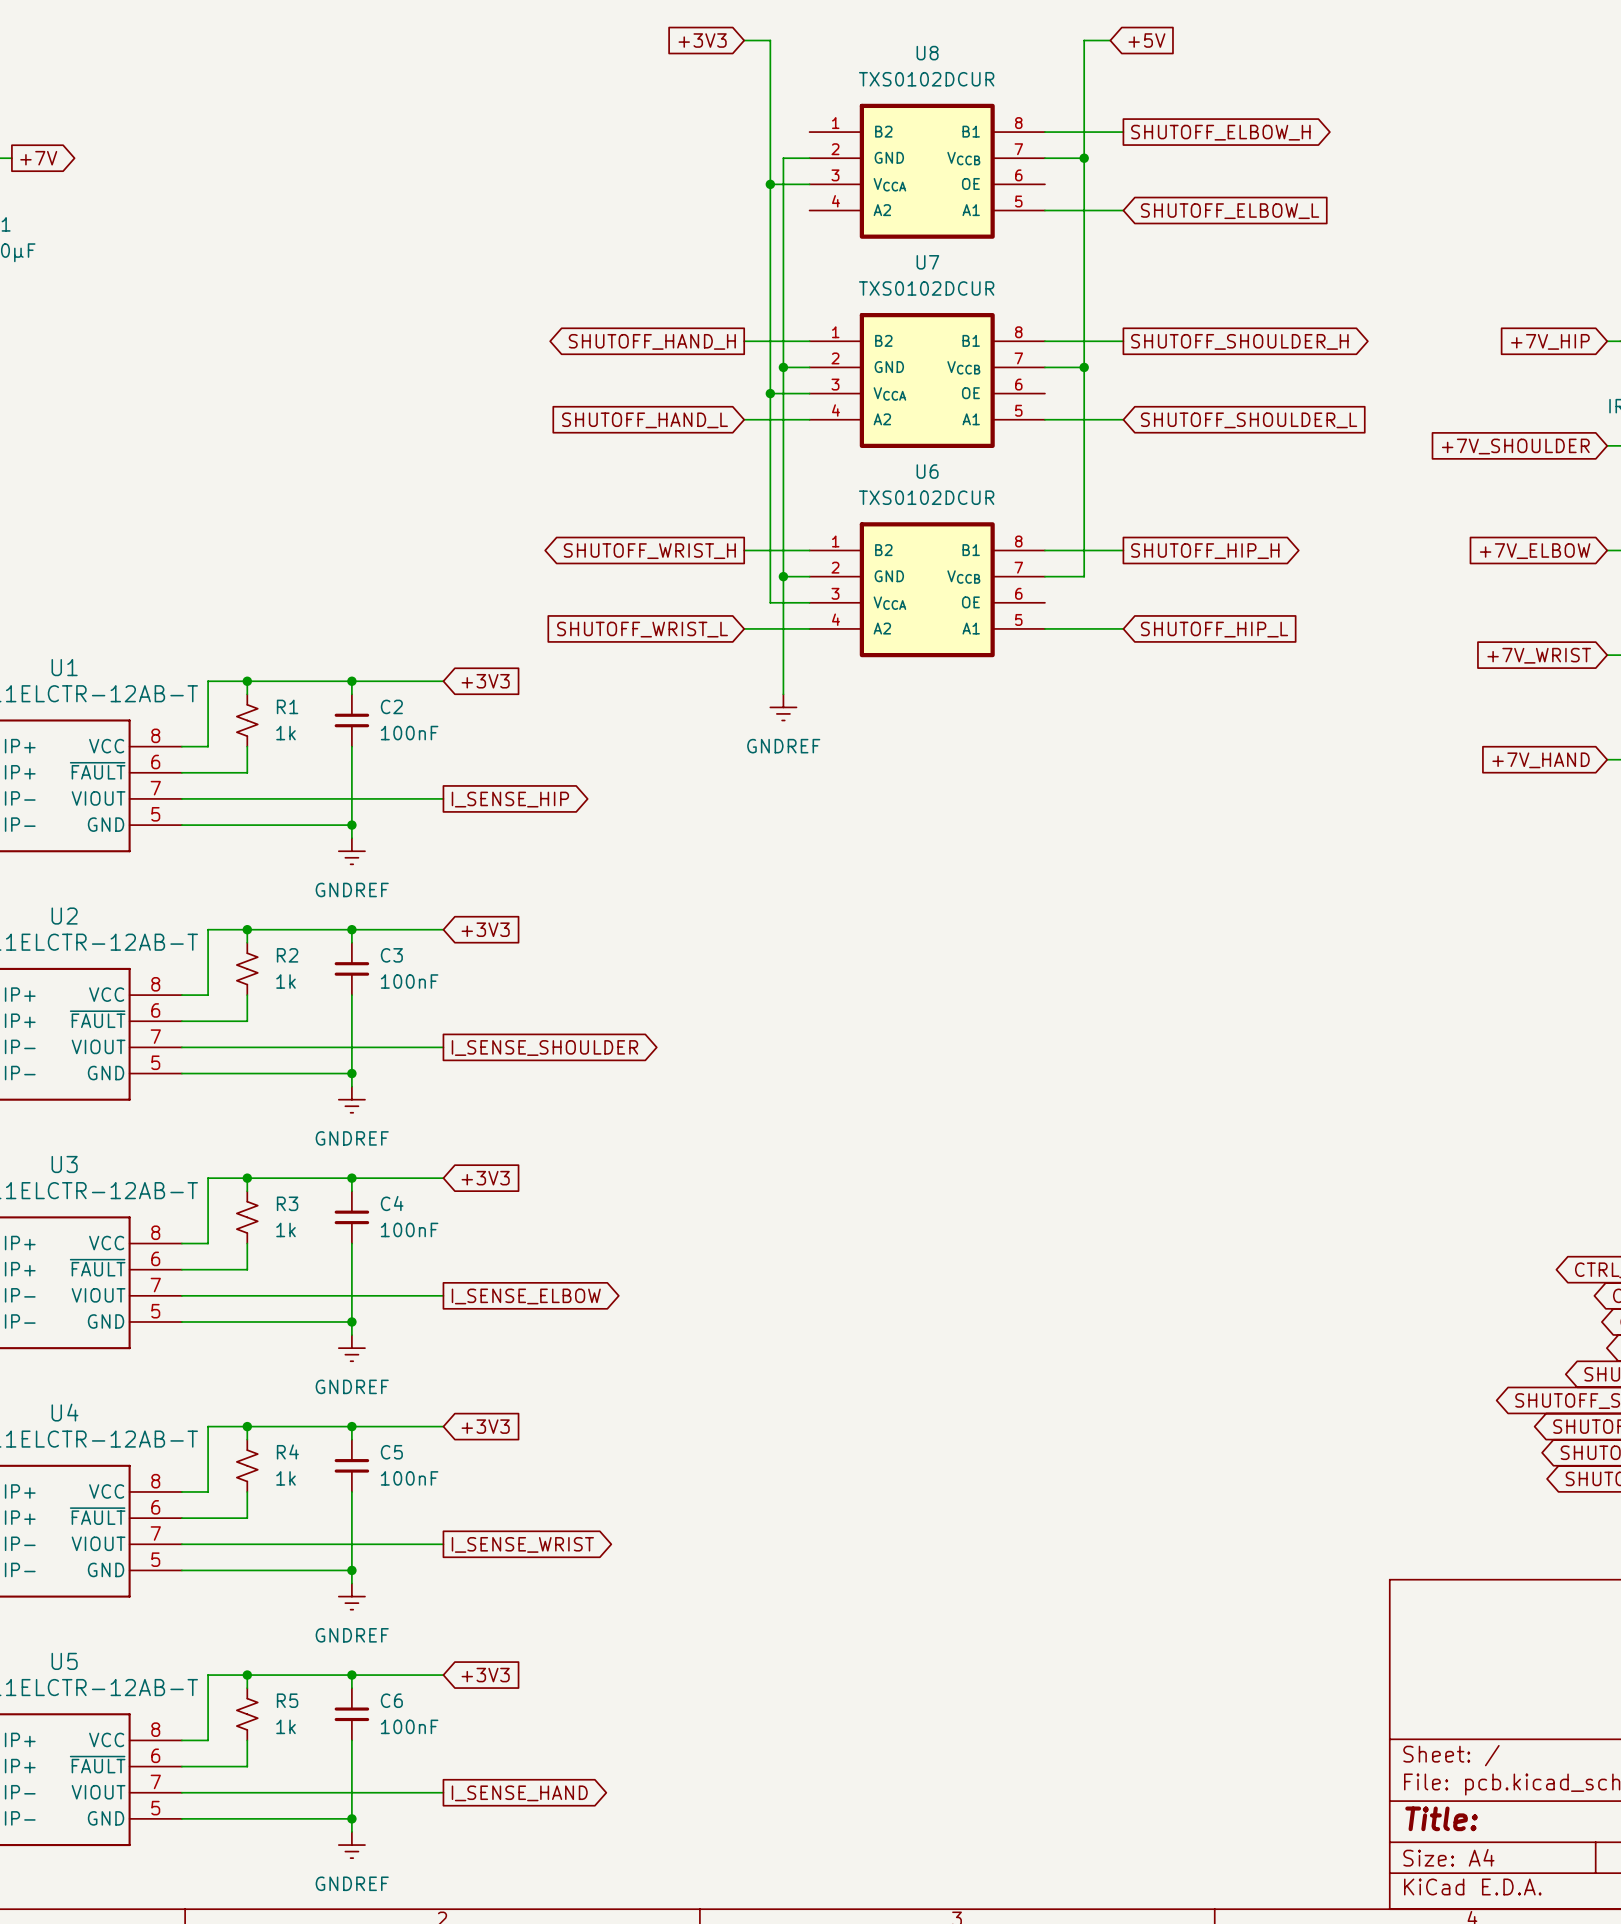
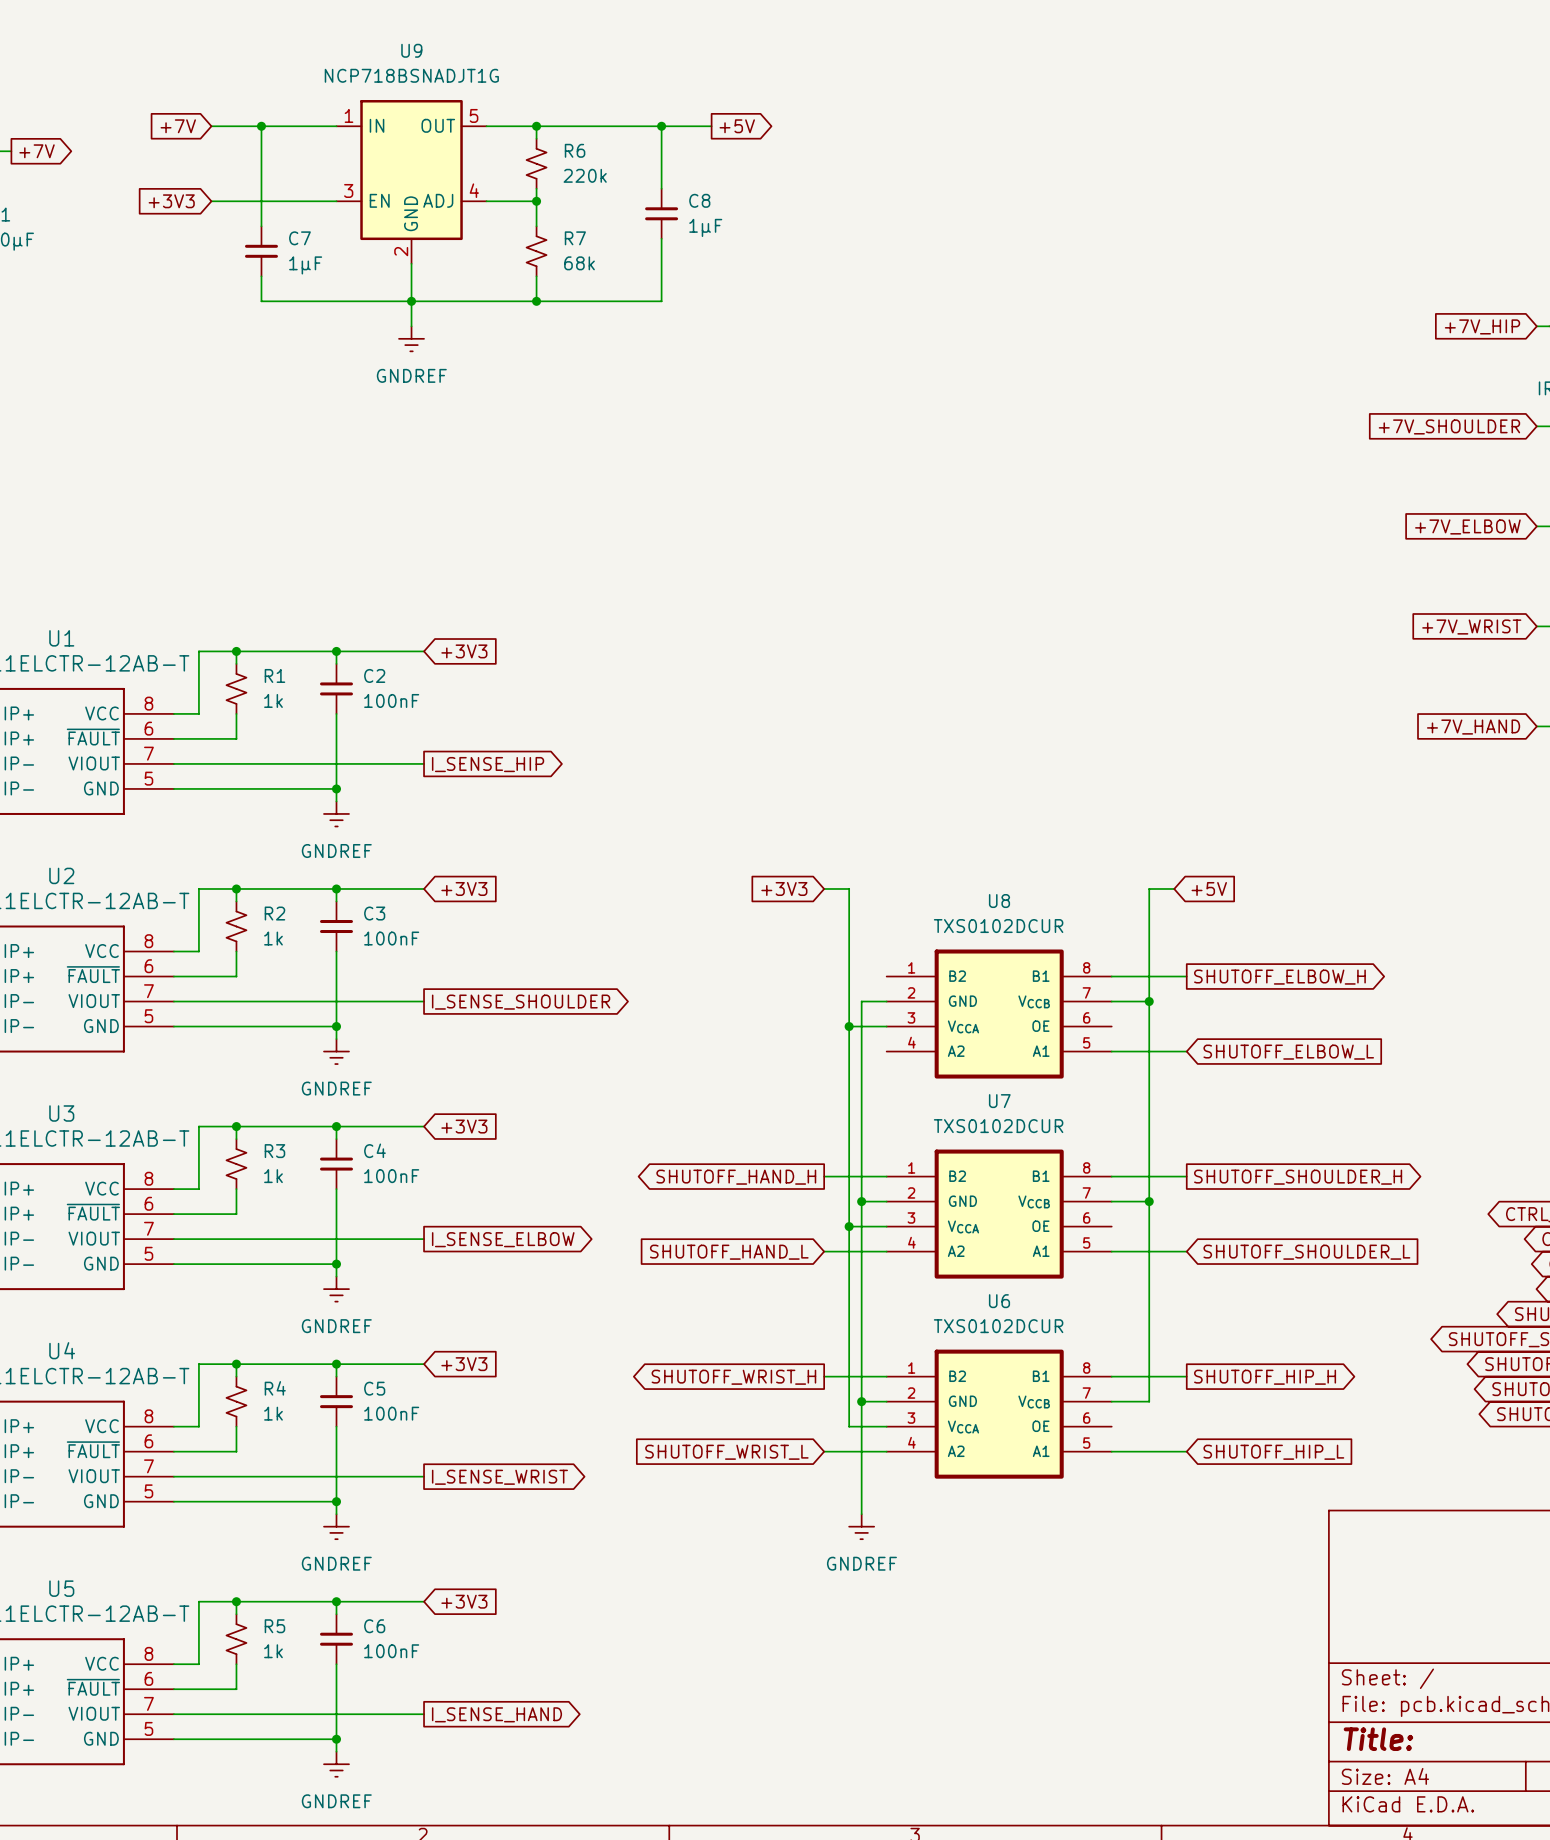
global label: +3V3 (702, 40) -> none
wire: (744, 40) (770, 40) (770, 602) (809, 602) -> none
wire: (1110, 40) (1084, 40) (1084, 576) (1044, 576) -> none
global label: +5V (1146, 40) -> none
global label: none -> +7V (178, 126)
wire: none -> (211, 126) (336, 126)
wire: none -> (261, 126) (261, 226)
junction: none -> (261, 126)
wire: none -> (486, 126) (711, 126)
wire: none -> (536, 126) (536, 138)
junction: none -> (536, 126)
wire: none -> (661, 126) (661, 188)
junction: none -> (661, 126)
global label: none -> +5V (737, 126)
wire: (1044, 132) (1123, 132) -> none
global label: SHUTOFF_ELBOW_H (1220, 132) -> none
wire: (809, 158) (783, 158) (783, 694) -> none
wire: (1044, 158) (1084, 158) -> none
junction: (1084, 158) -> none
R6: none -> 220k (536, 163)
U8 position: (927, 171) -> (999, 1014)
wire: (770, 184) (809, 184) -> none
junction: (770, 184) -> none
U9: none -> NCP718BSNADJT1G (411, 181)
wire: none -> (536, 188) (536, 226)
global label: none -> +3V3 (171, 201)
wire: none -> (211, 201) (336, 201)
wire: none -> (486, 201) (536, 201)
junction: none -> (536, 201)
wire: (1044, 210) (1123, 210) -> none
global label: SHUTOFF_ELBOW_L (1230, 211) -> none
C8: none -> 1µF (661, 213)
wire: none -> (661, 238) (661, 301) (261, 301) (261, 276)
C7: none -> 1µF (261, 251)
R7: none -> 68k (536, 251)
wire: none -> (411, 263) (411, 326)
wire: none -> (536, 276) (536, 301)
junction: none -> (411, 301)
junction: none -> (536, 301)
global label: SHUTOFF_HAND_H (652, 341) -> none
wire: (744, 341) (809, 341) -> none
wire: (1044, 341) (1123, 341) -> none
global label: SHUTOFF_SHOULDER_H (1239, 341) -> none
power symbol: none -> GNDREF (411, 338)
wire: (783, 367) (809, 367) -> none
junction: (783, 367) -> none
wire: (1044, 367) (1084, 367) -> none
junction: (1084, 367) -> none
U7 position: (927, 380) -> (999, 1214)
wire: (770, 393) (809, 393) -> none
junction: (770, 393) -> none
wire: (744, 419) (809, 419) -> none
wire: (1044, 419) (1123, 419) -> none
global label: SHUTOFF_HAND_L (645, 420) -> none
global label: SHUTOFF_SHOULDER_L (1249, 420) -> none
wire: (744, 550) (809, 550) -> none
wire: (1044, 550) (1123, 550) -> none
global label: SHUTOFF_WRIST_H (649, 551) -> none
global label: SHUTOFF_HIP_H (1205, 551) -> none
wire: (783, 576) (809, 576) -> none
junction: (783, 576) -> none
U6 position: (927, 589) -> (999, 1414)
wire: (744, 628) (809, 628) -> none
wire: (1044, 628) (1123, 628) -> none
global label: SHUTOFF_WRIST_L (642, 629) -> none
global label: SHUTOFF_HIP_L (1214, 629) -> none
power symbol: GNDREF (783, 707) -> none
global label: none -> +3V3 (784, 888)
wire: none -> (824, 888) (849, 888) (849, 1426) (886, 1426)
wire: none -> (1174, 888) (1149, 888) (1149, 1401) (1111, 1401)
global label: none -> +5V (1209, 888)
wire: none -> (1111, 976) (1186, 976)
global label: none -> SHUTOFF_ELBOW_H (1279, 977)
wire: none -> (886, 1001) (861, 1001) (861, 1514)
wire: none -> (1111, 1001) (1149, 1001)
junction: none -> (1149, 1001)
wire: none -> (849, 1026) (886, 1026)
junction: none -> (849, 1026)
wire: none -> (1111, 1051) (1186, 1051)
global label: none -> SHUTOFF_ELBOW_L (1288, 1052)
wire: none -> (824, 1176) (886, 1176)
wire: none -> (1111, 1176) (1186, 1176)
global label: none -> SHUTOFF_HAND_H (736, 1177)
global label: none -> SHUTOFF_SHOULDER_H (1298, 1177)
wire: none -> (861, 1201) (886, 1201)
junction: none -> (861, 1201)
wire: none -> (1111, 1201) (1149, 1201)
junction: none -> (1149, 1201)
wire: none -> (849, 1226) (886, 1226)
junction: none -> (849, 1226)
wire: none -> (824, 1251) (886, 1251)
wire: none -> (1111, 1251) (1186, 1251)
global label: none -> SHUTOFF_HAND_L (729, 1252)
global label: none -> SHUTOFF_SHOULDER_L (1306, 1252)
wire: none -> (824, 1376) (886, 1376)
wire: none -> (1111, 1376) (1186, 1376)
global label: none -> SHUTOFF_WRIST_H (733, 1377)
global label: none -> SHUTOFF_HIP_H (1265, 1377)
wire: none -> (861, 1401) (886, 1401)
junction: none -> (861, 1401)
global label: none -> SHUTOFF_WRIST_L (726, 1452)
wire: none -> (824, 1451) (886, 1451)
wire: none -> (1111, 1451) (1186, 1451)
global label: none -> SHUTOFF_HIP_L (1273, 1452)
power symbol: none -> GNDREF (861, 1526)

